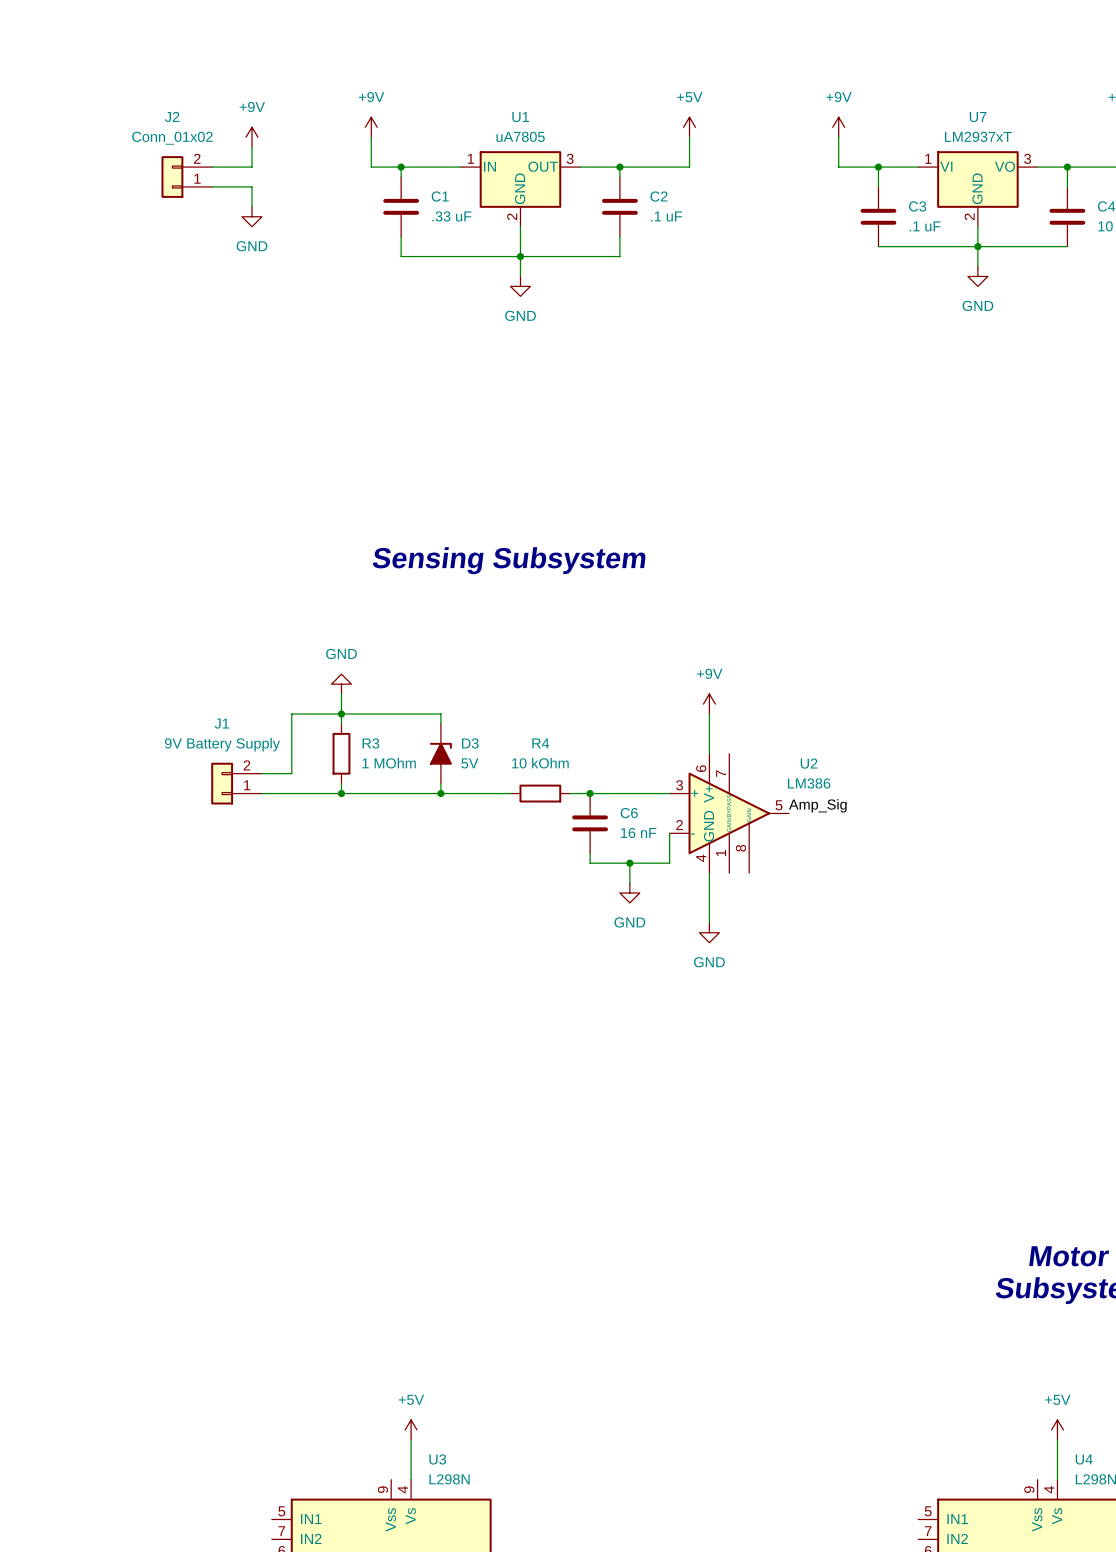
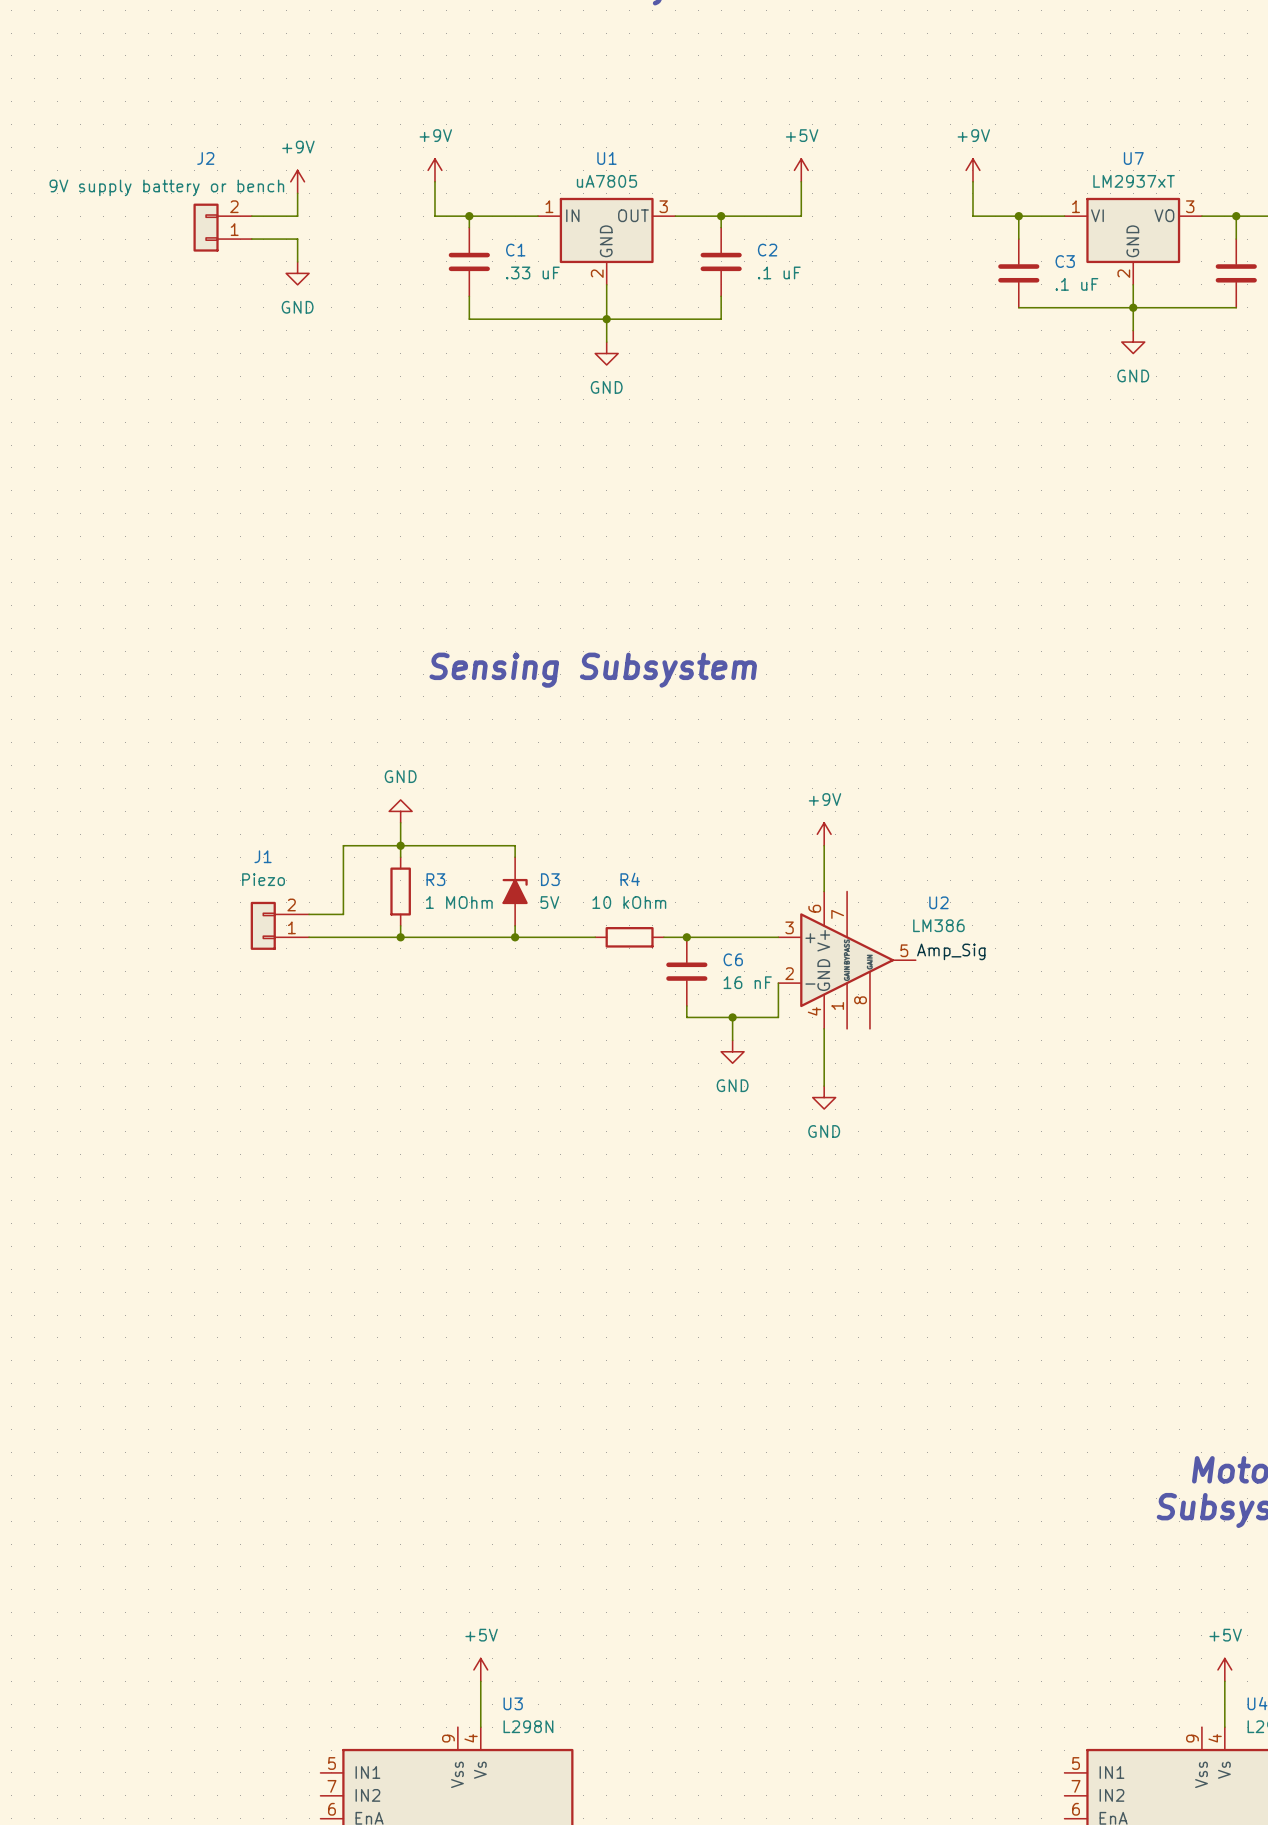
J2 value: Conn_01x02 (172, 138) -> 9V supply battery or bench (166, 187)
J1 value: 9V Battery Supply (222, 744) -> Piezo (263, 879)

